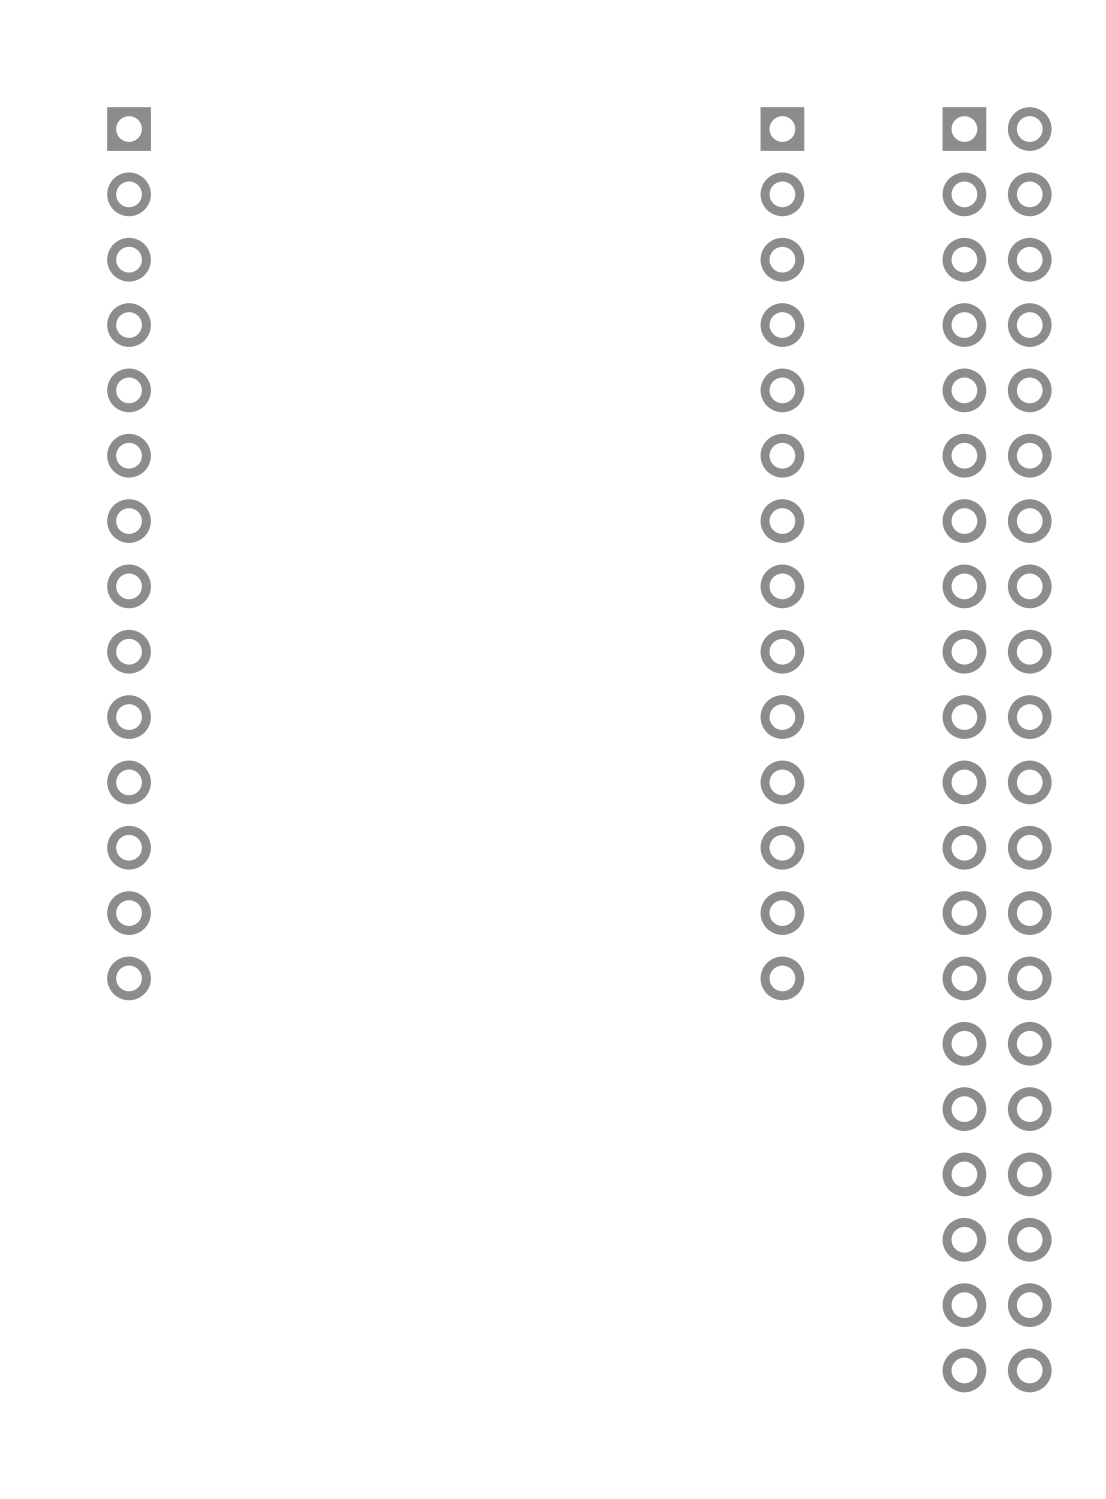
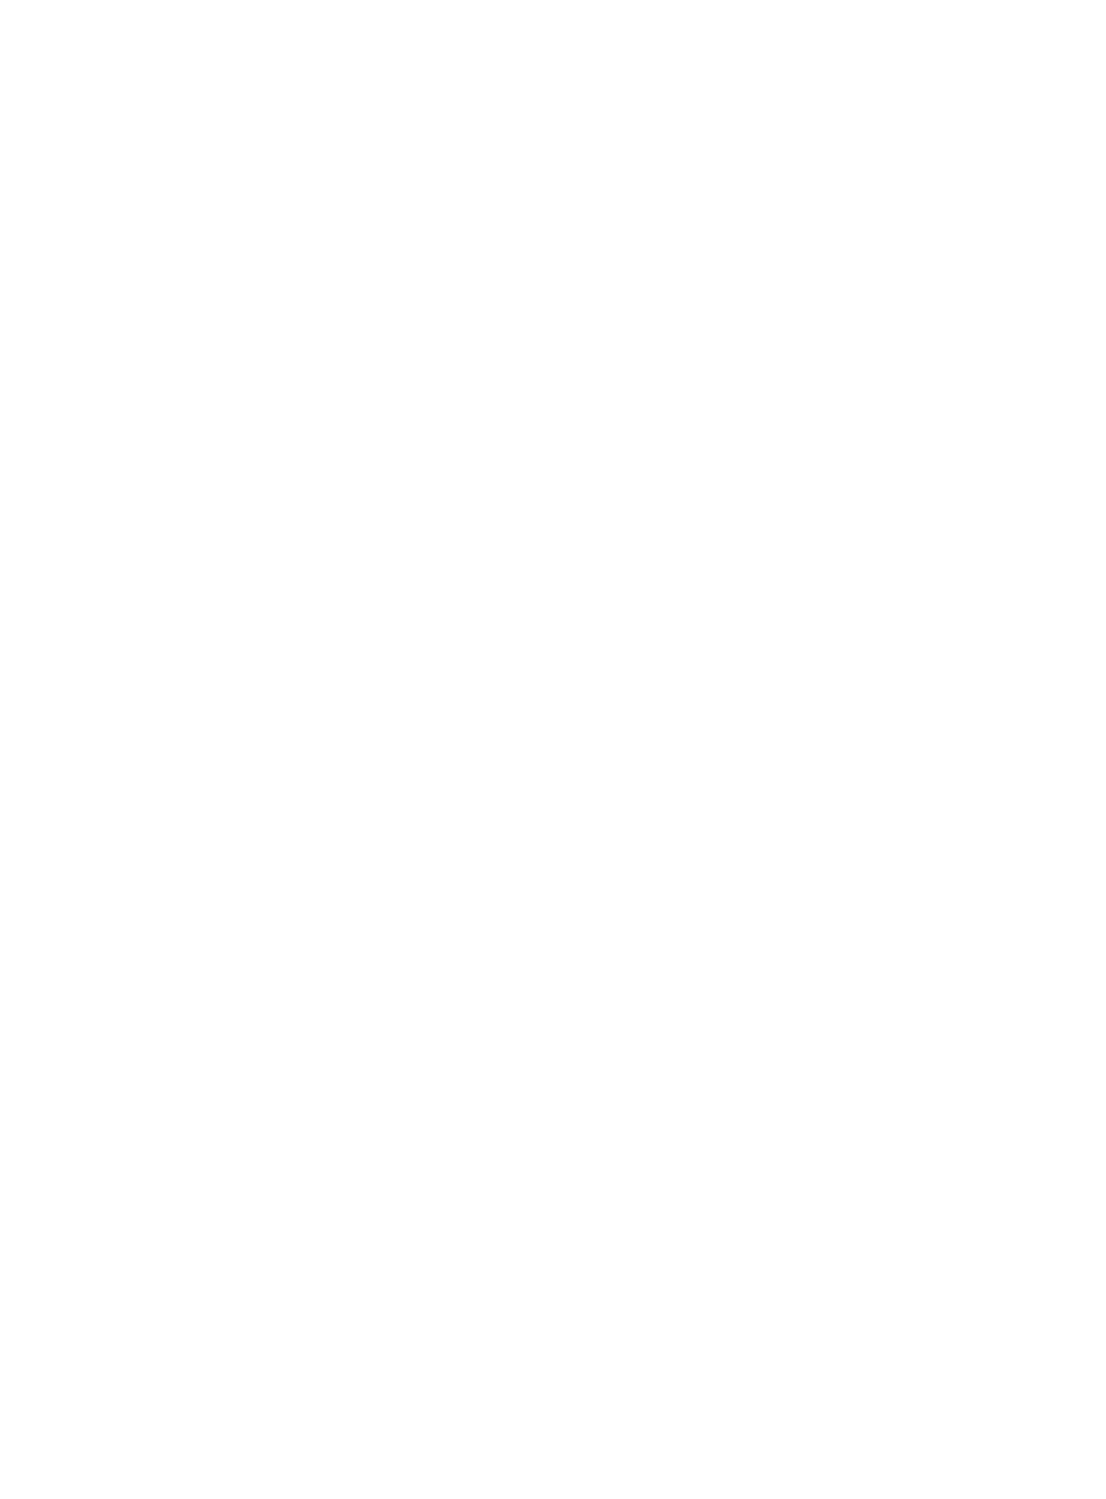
part: (129, 553) -> none
part: (782, 553) -> none
part: (997, 749) -> none

